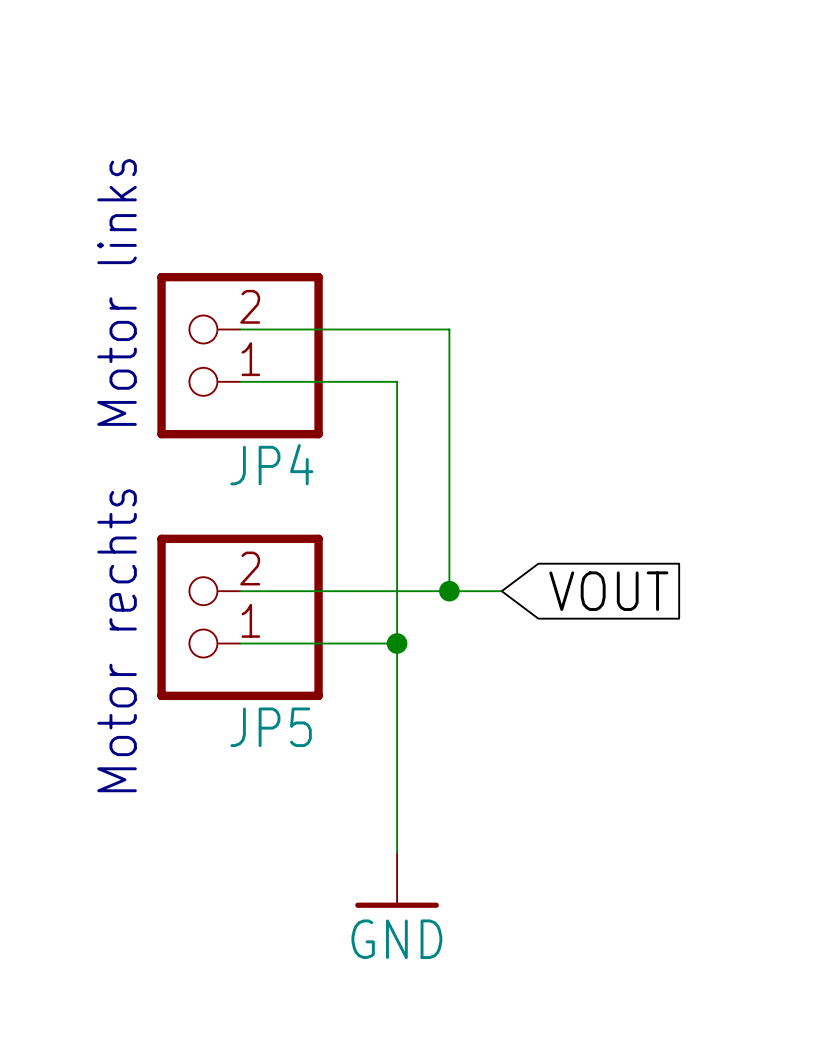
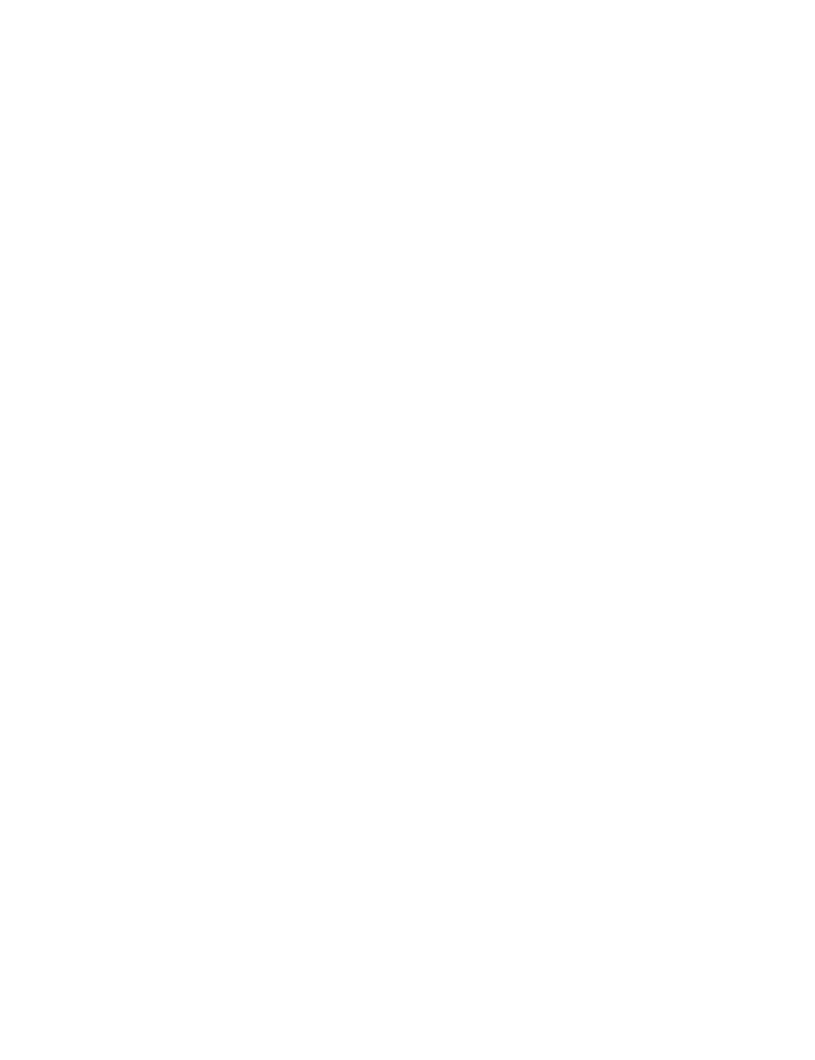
text: Motor links (117, 292) -> none
wire: (240, 329) (449, 329) (449, 591) -> none
JP4: (240, 355) -> none
wire: (240, 381) (397, 381) (397, 852) -> none
wire: (240, 591) (501, 591) -> none
junction: (449, 591) -> none
global label: VOUT (608, 591) -> none
JP5: (240, 617) -> none
text: Motor rechts (117, 640) -> none
wire: (240, 643) (397, 643) -> none
junction: (397, 643) -> none
power symbol: GND (397, 880) -> none

